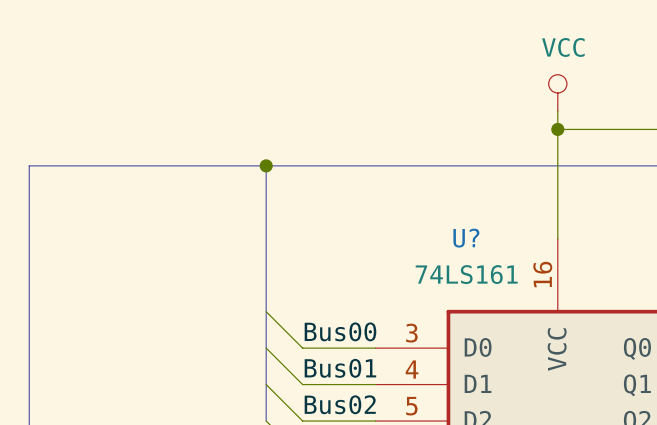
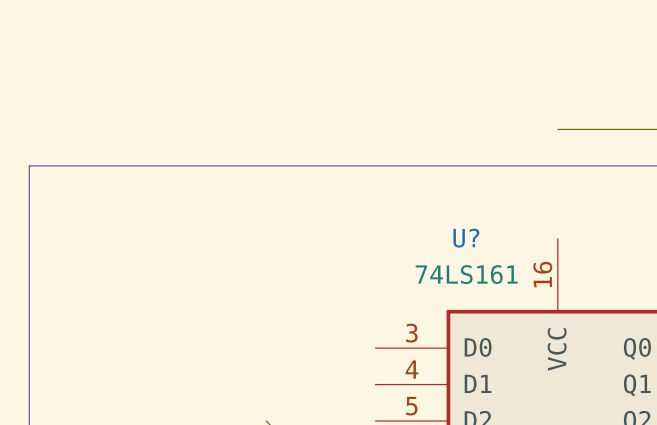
power symbol: VCC (557, 92) -> none
wire: (557, 111) (557, 238) -> none
junction: (557, 129) -> none
bus: (266, 165) (266, 421) -> none
junction: (266, 165) -> none
wire: (266, 311) (302, 348) (375, 348) -> none
label: Bus00 (340, 331) -> none
wire: (266, 348) (302, 384) (375, 384) -> none
label: Bus01 (340, 368) -> none
wire: (266, 384) (302, 421) (375, 421) -> none
label: Bus02 (340, 404) -> none

